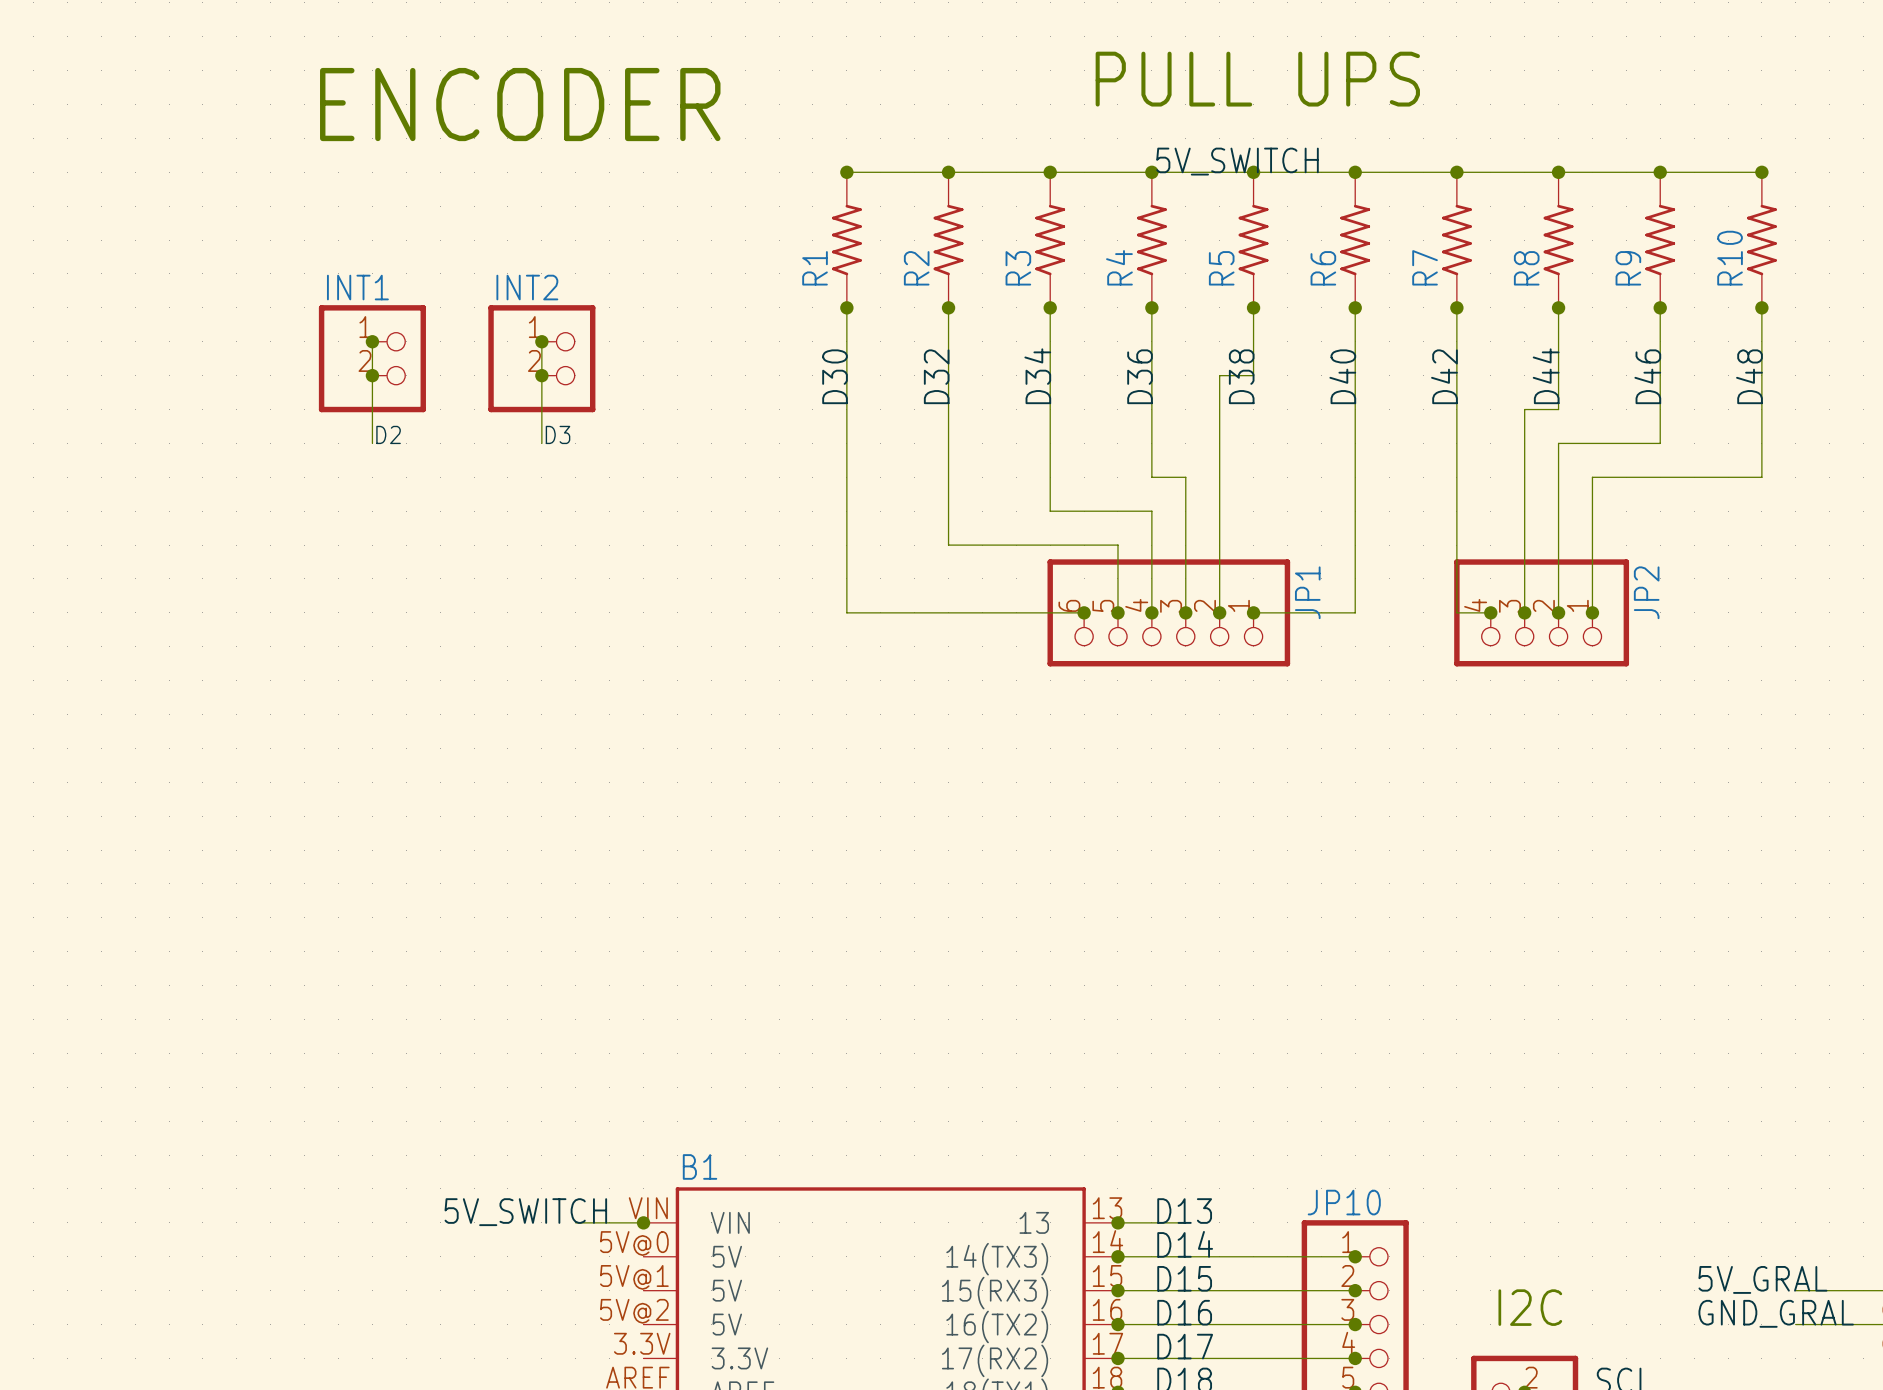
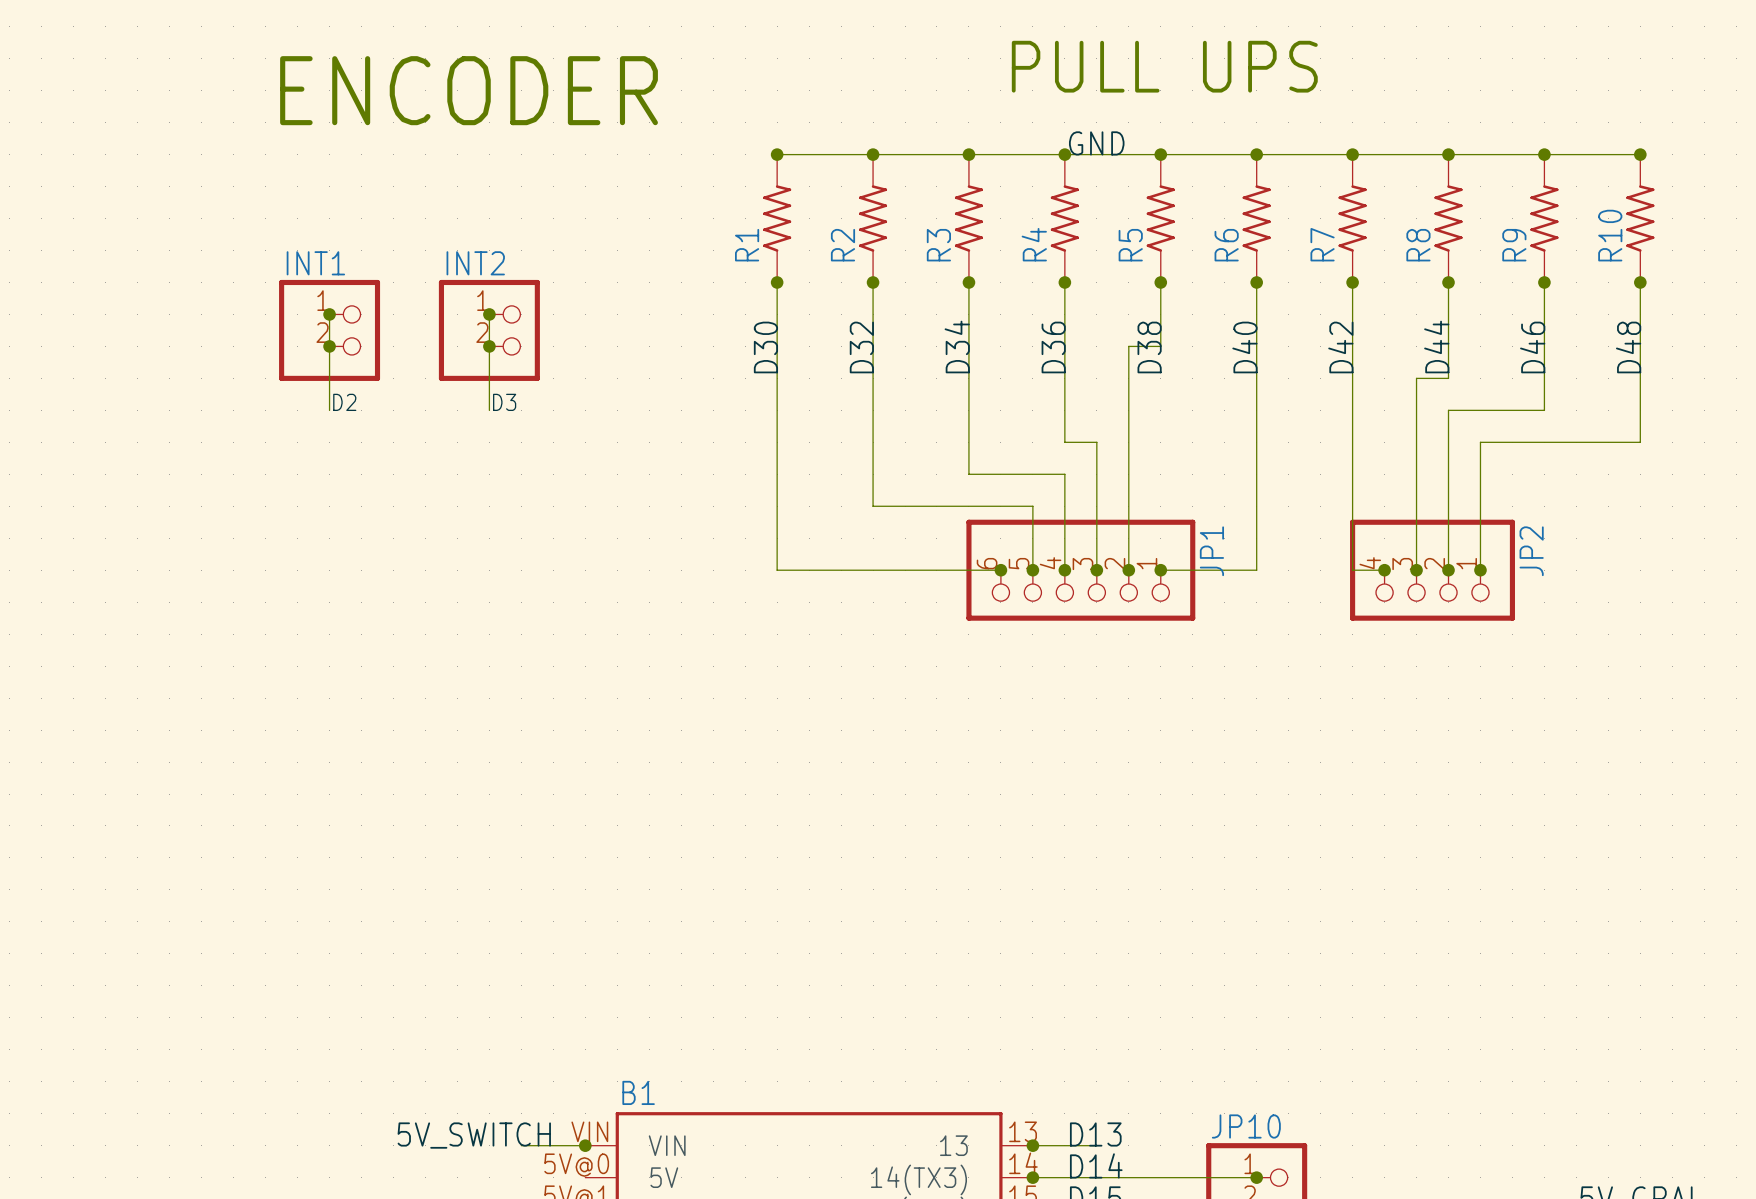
label: 5V_SWITCH (1237, 161) -> GND (1096, 143)

